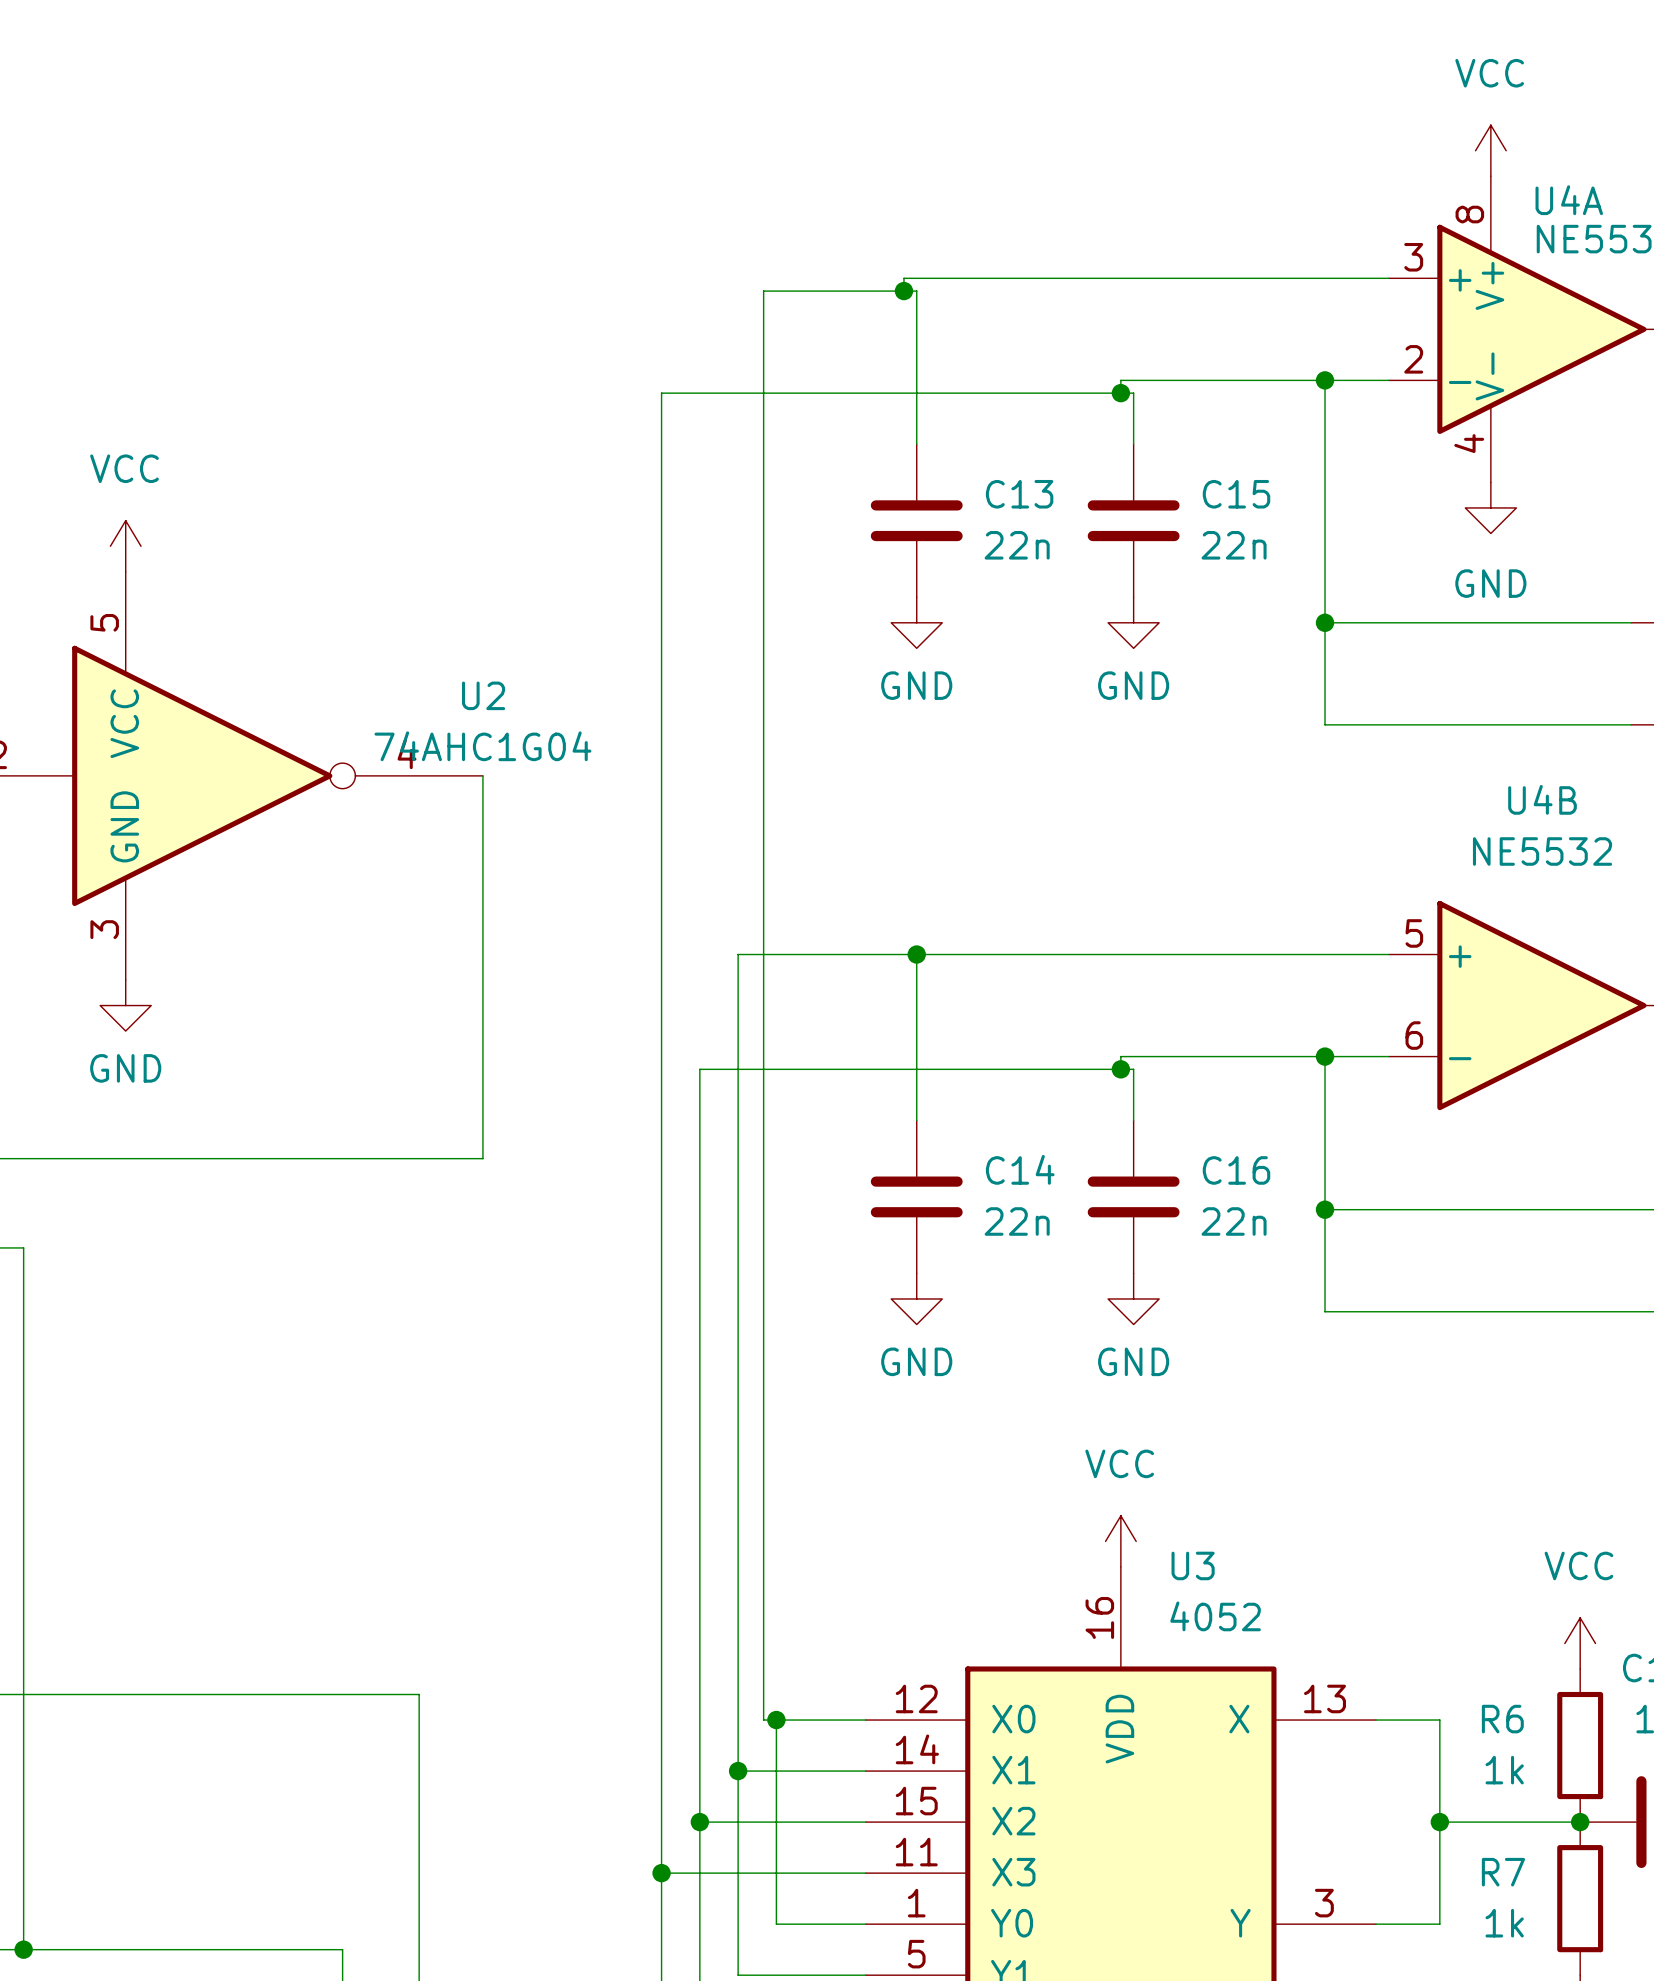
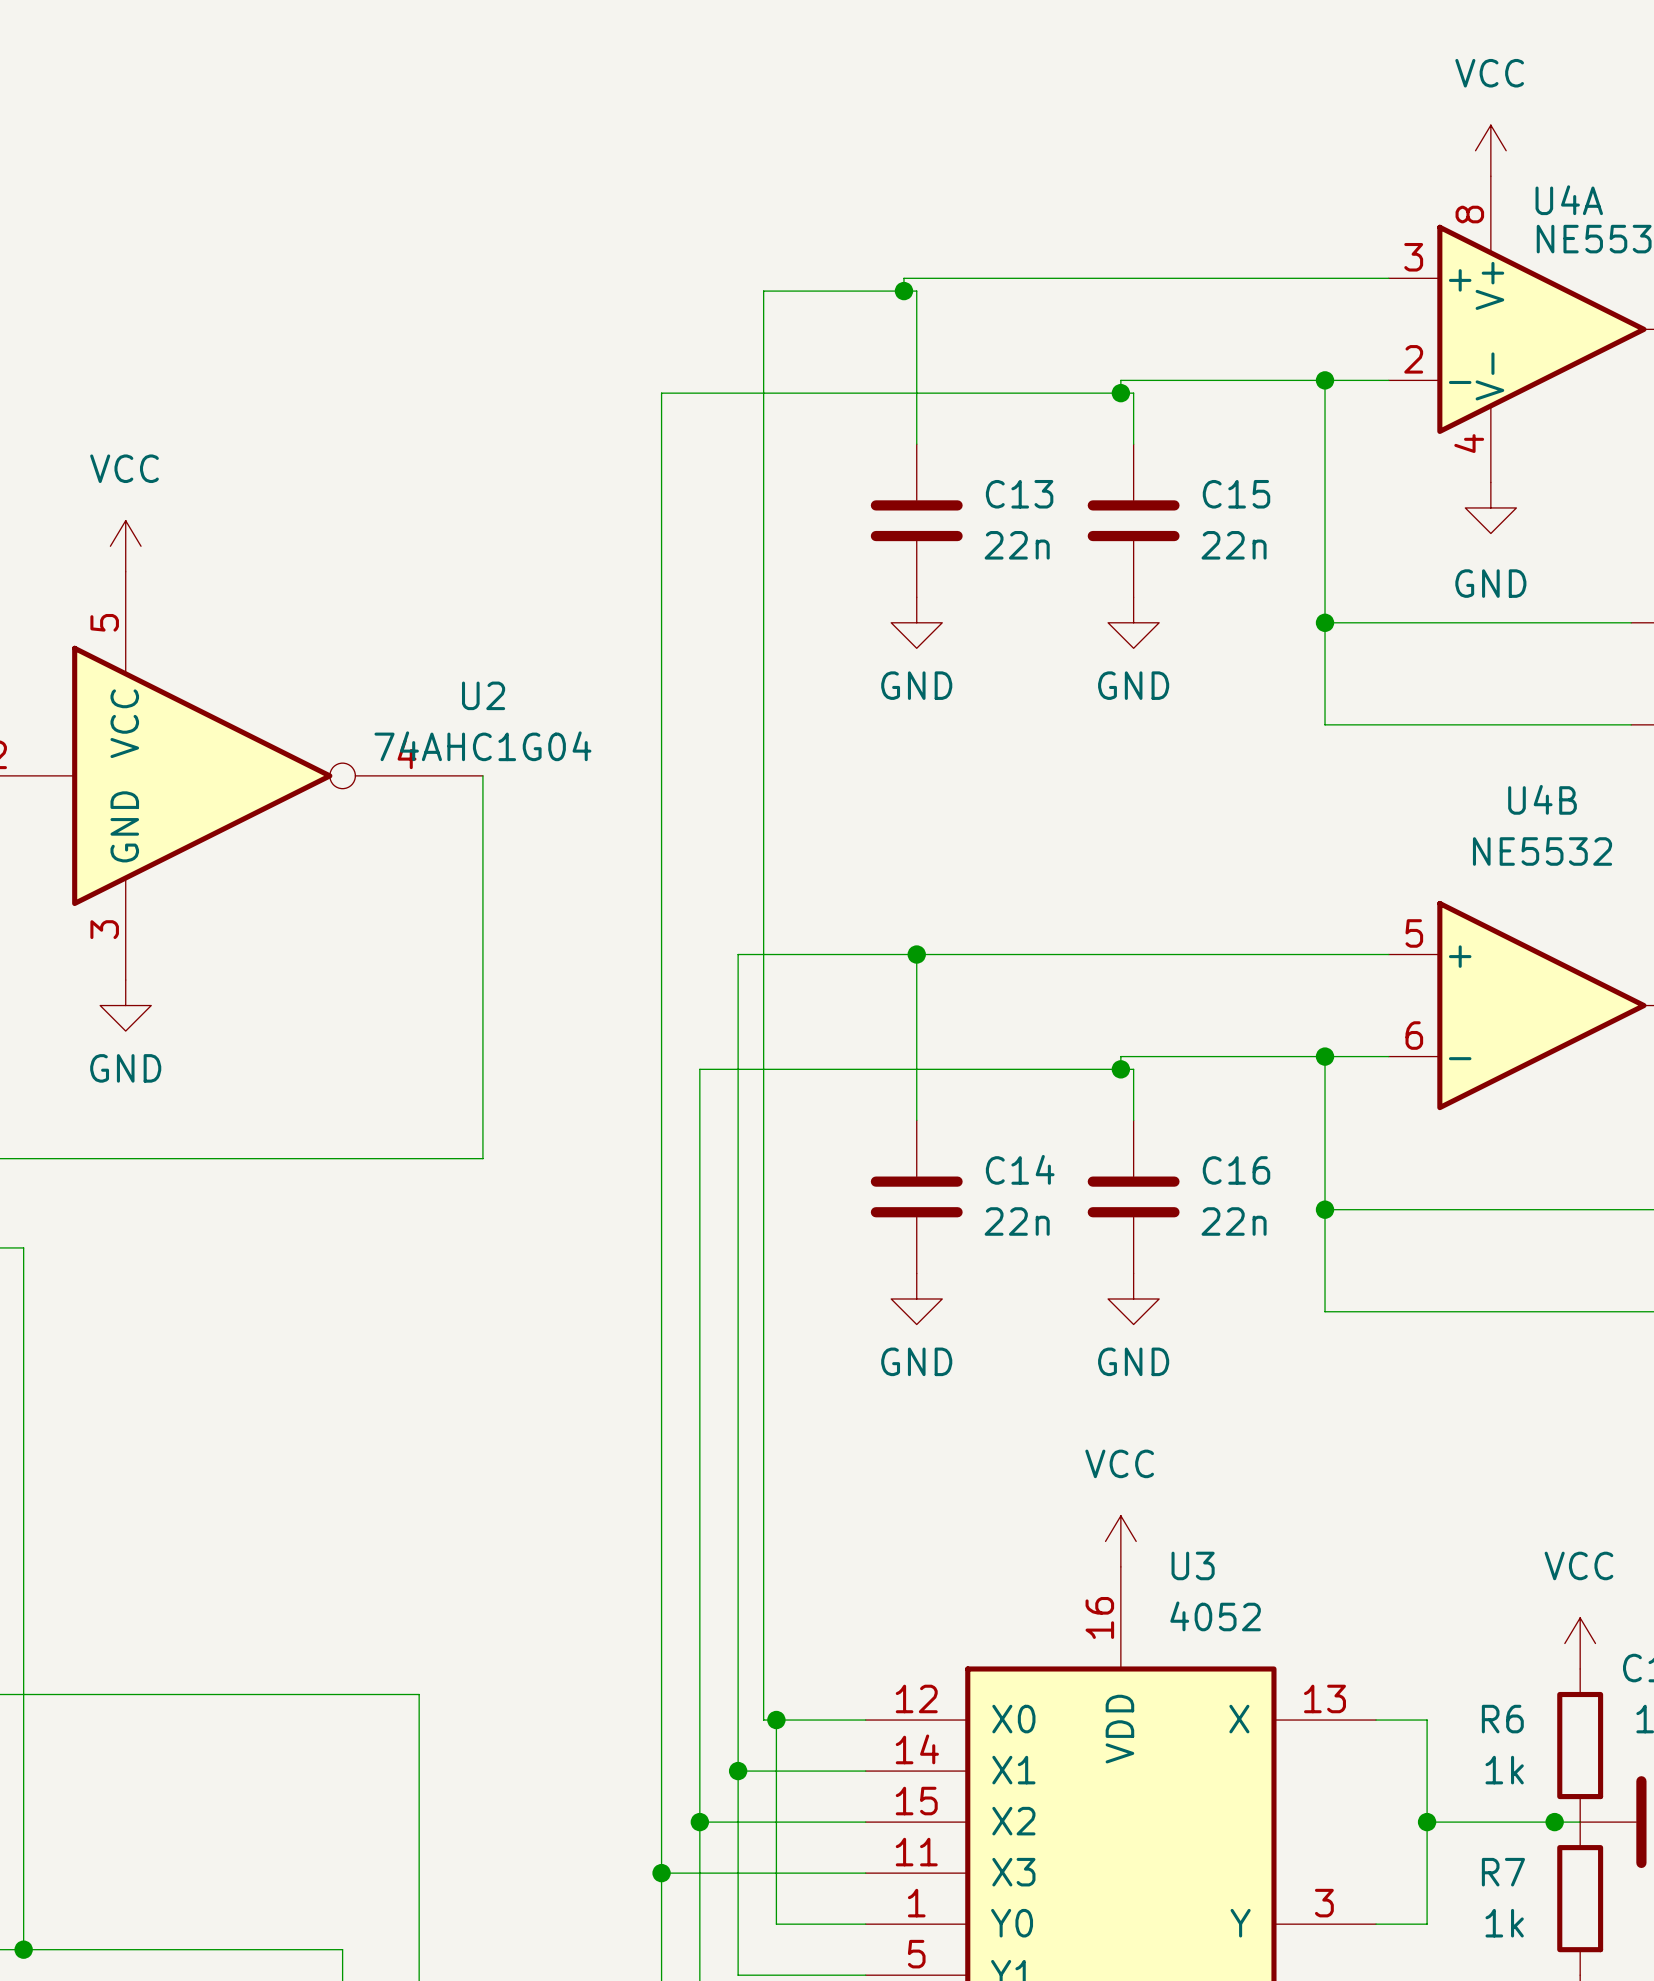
wire: (1427, 1720) (1439, 1720) (1439, 1924) (1427, 1924) -> (1427, 1720) (1427, 1924)
junction position: (1439, 1822) -> (1427, 1822)
junction position: (1580, 1822) -> (1554, 1822)

